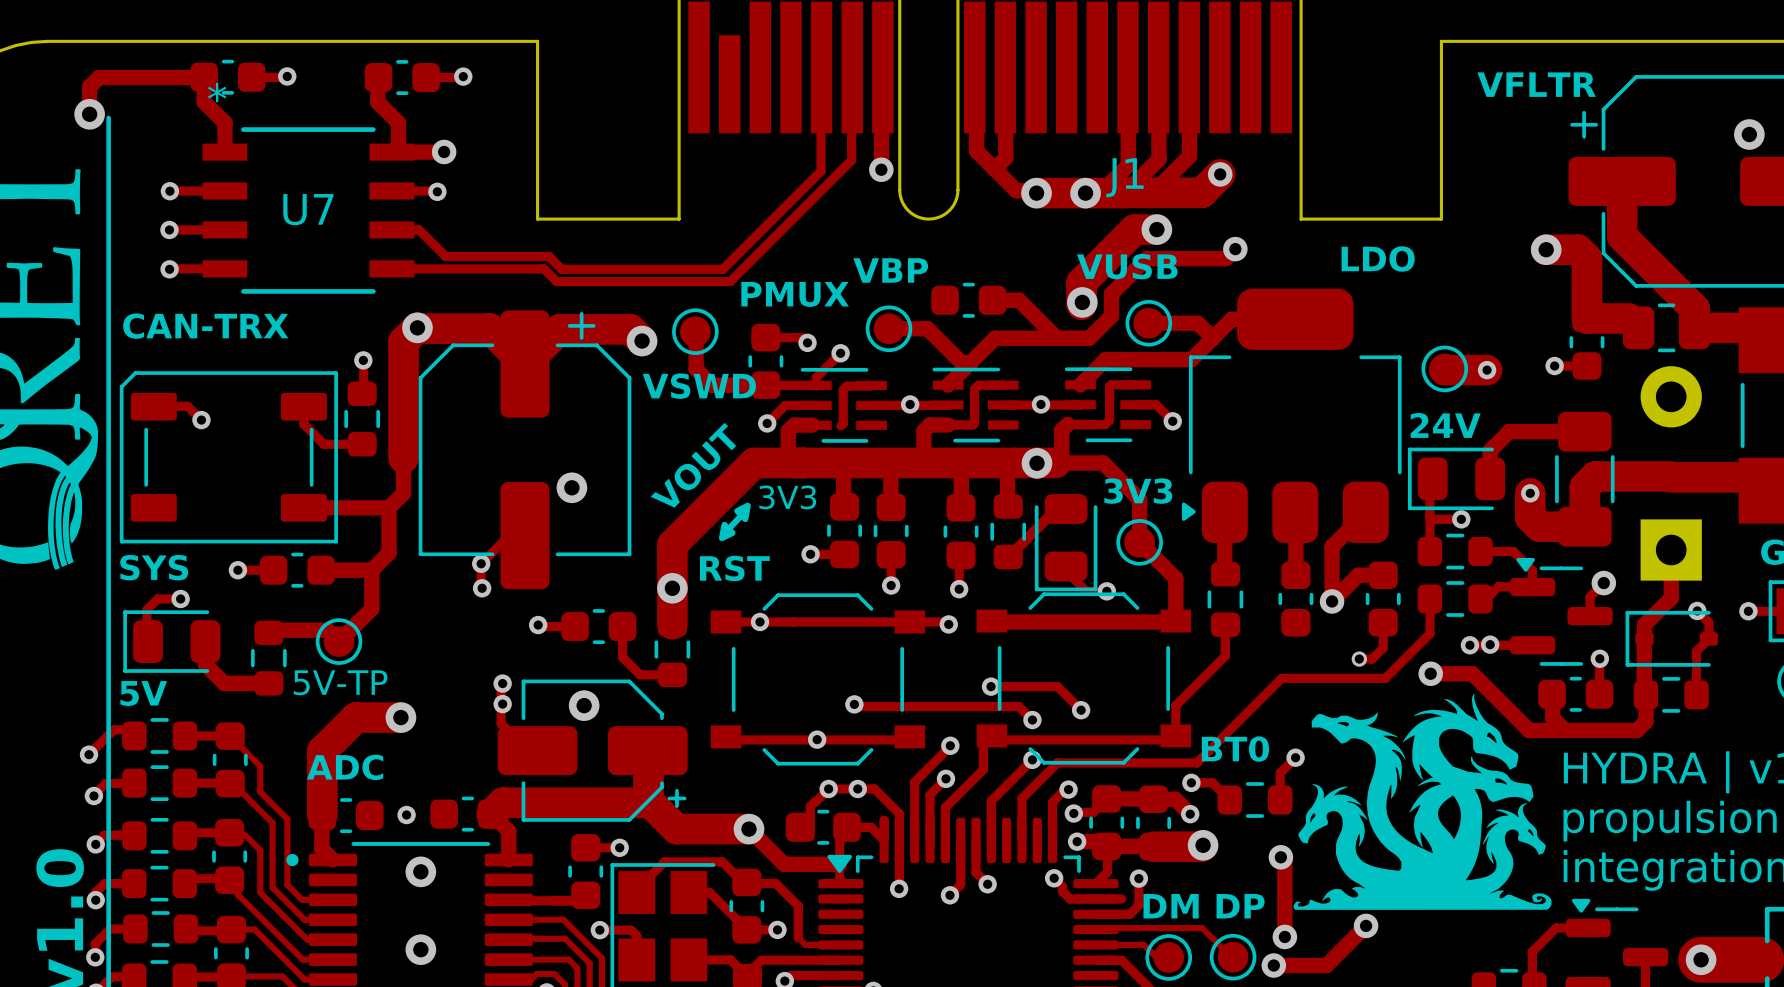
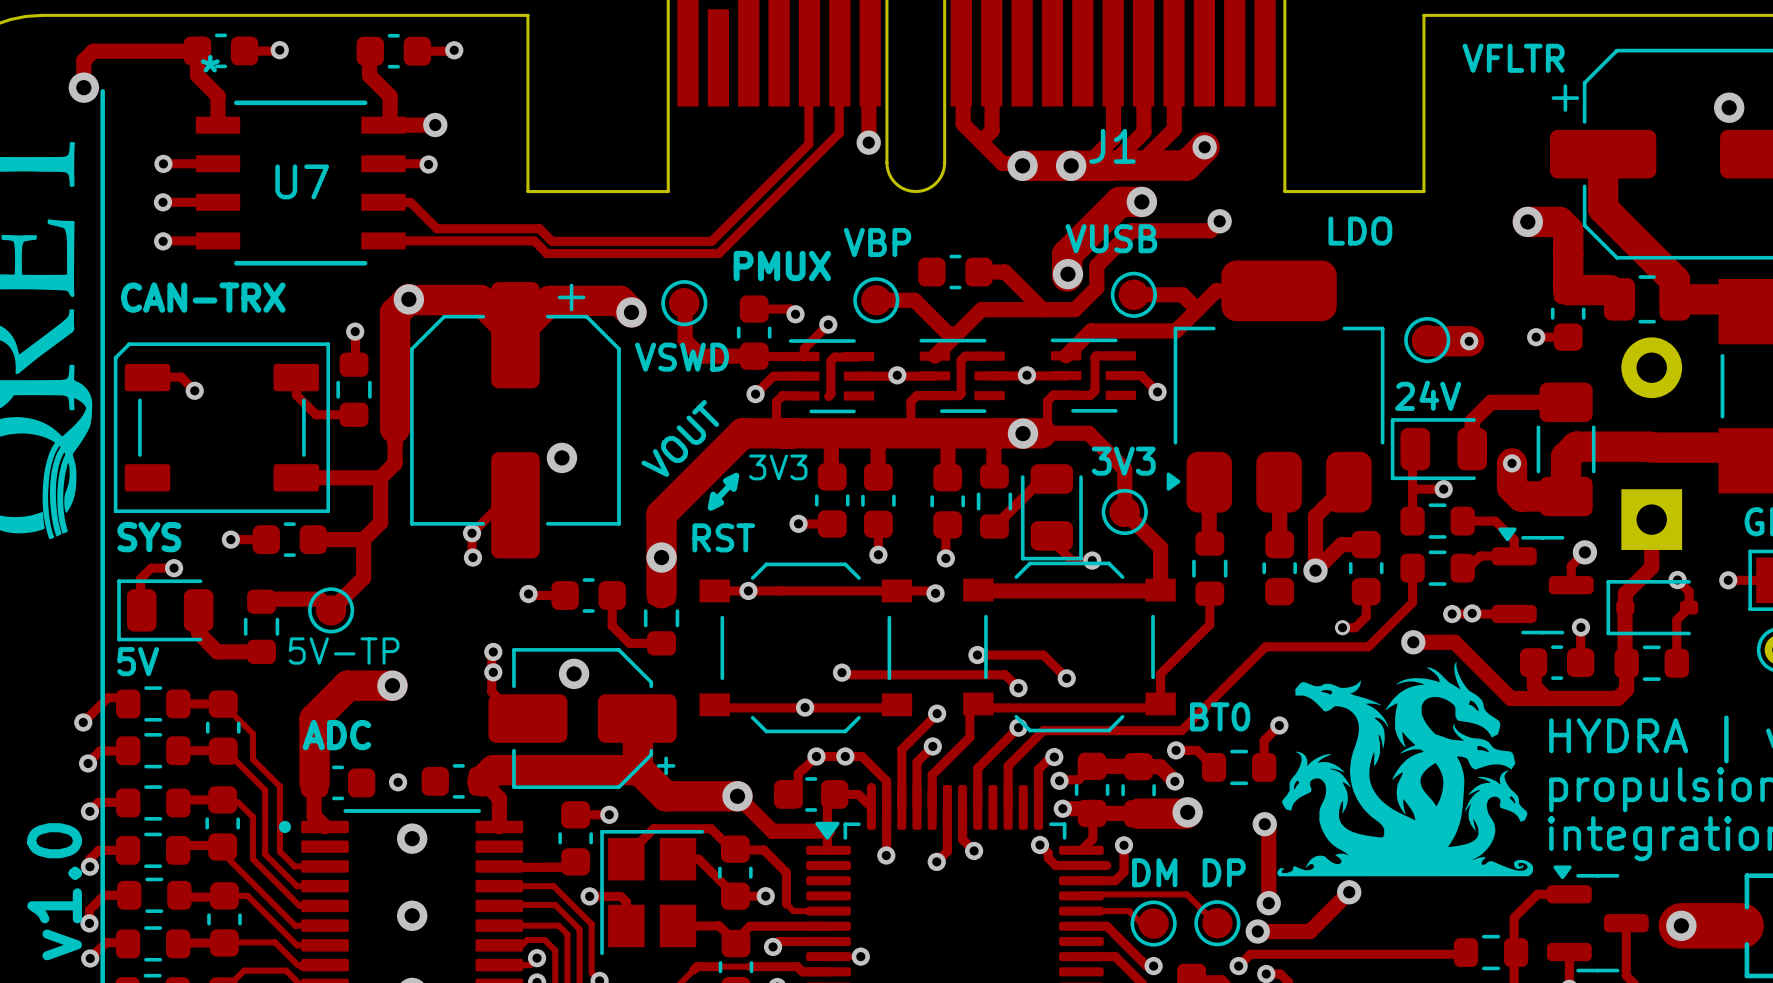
track width: thick (948, 424) (929, 424) (923, 430) (923, 462) -> thin (934, 395) (916, 395) (910, 401) (910, 433)
track width: thick (1067, 424) (1061, 430) (1061, 462) -> thin (1053, 395) (1047, 400) (1047, 432)
track width: thick (812, 425) (794, 425) (788, 431) (788, 463) -> thin (800, 395) (782, 395) (776, 401) (776, 433)

